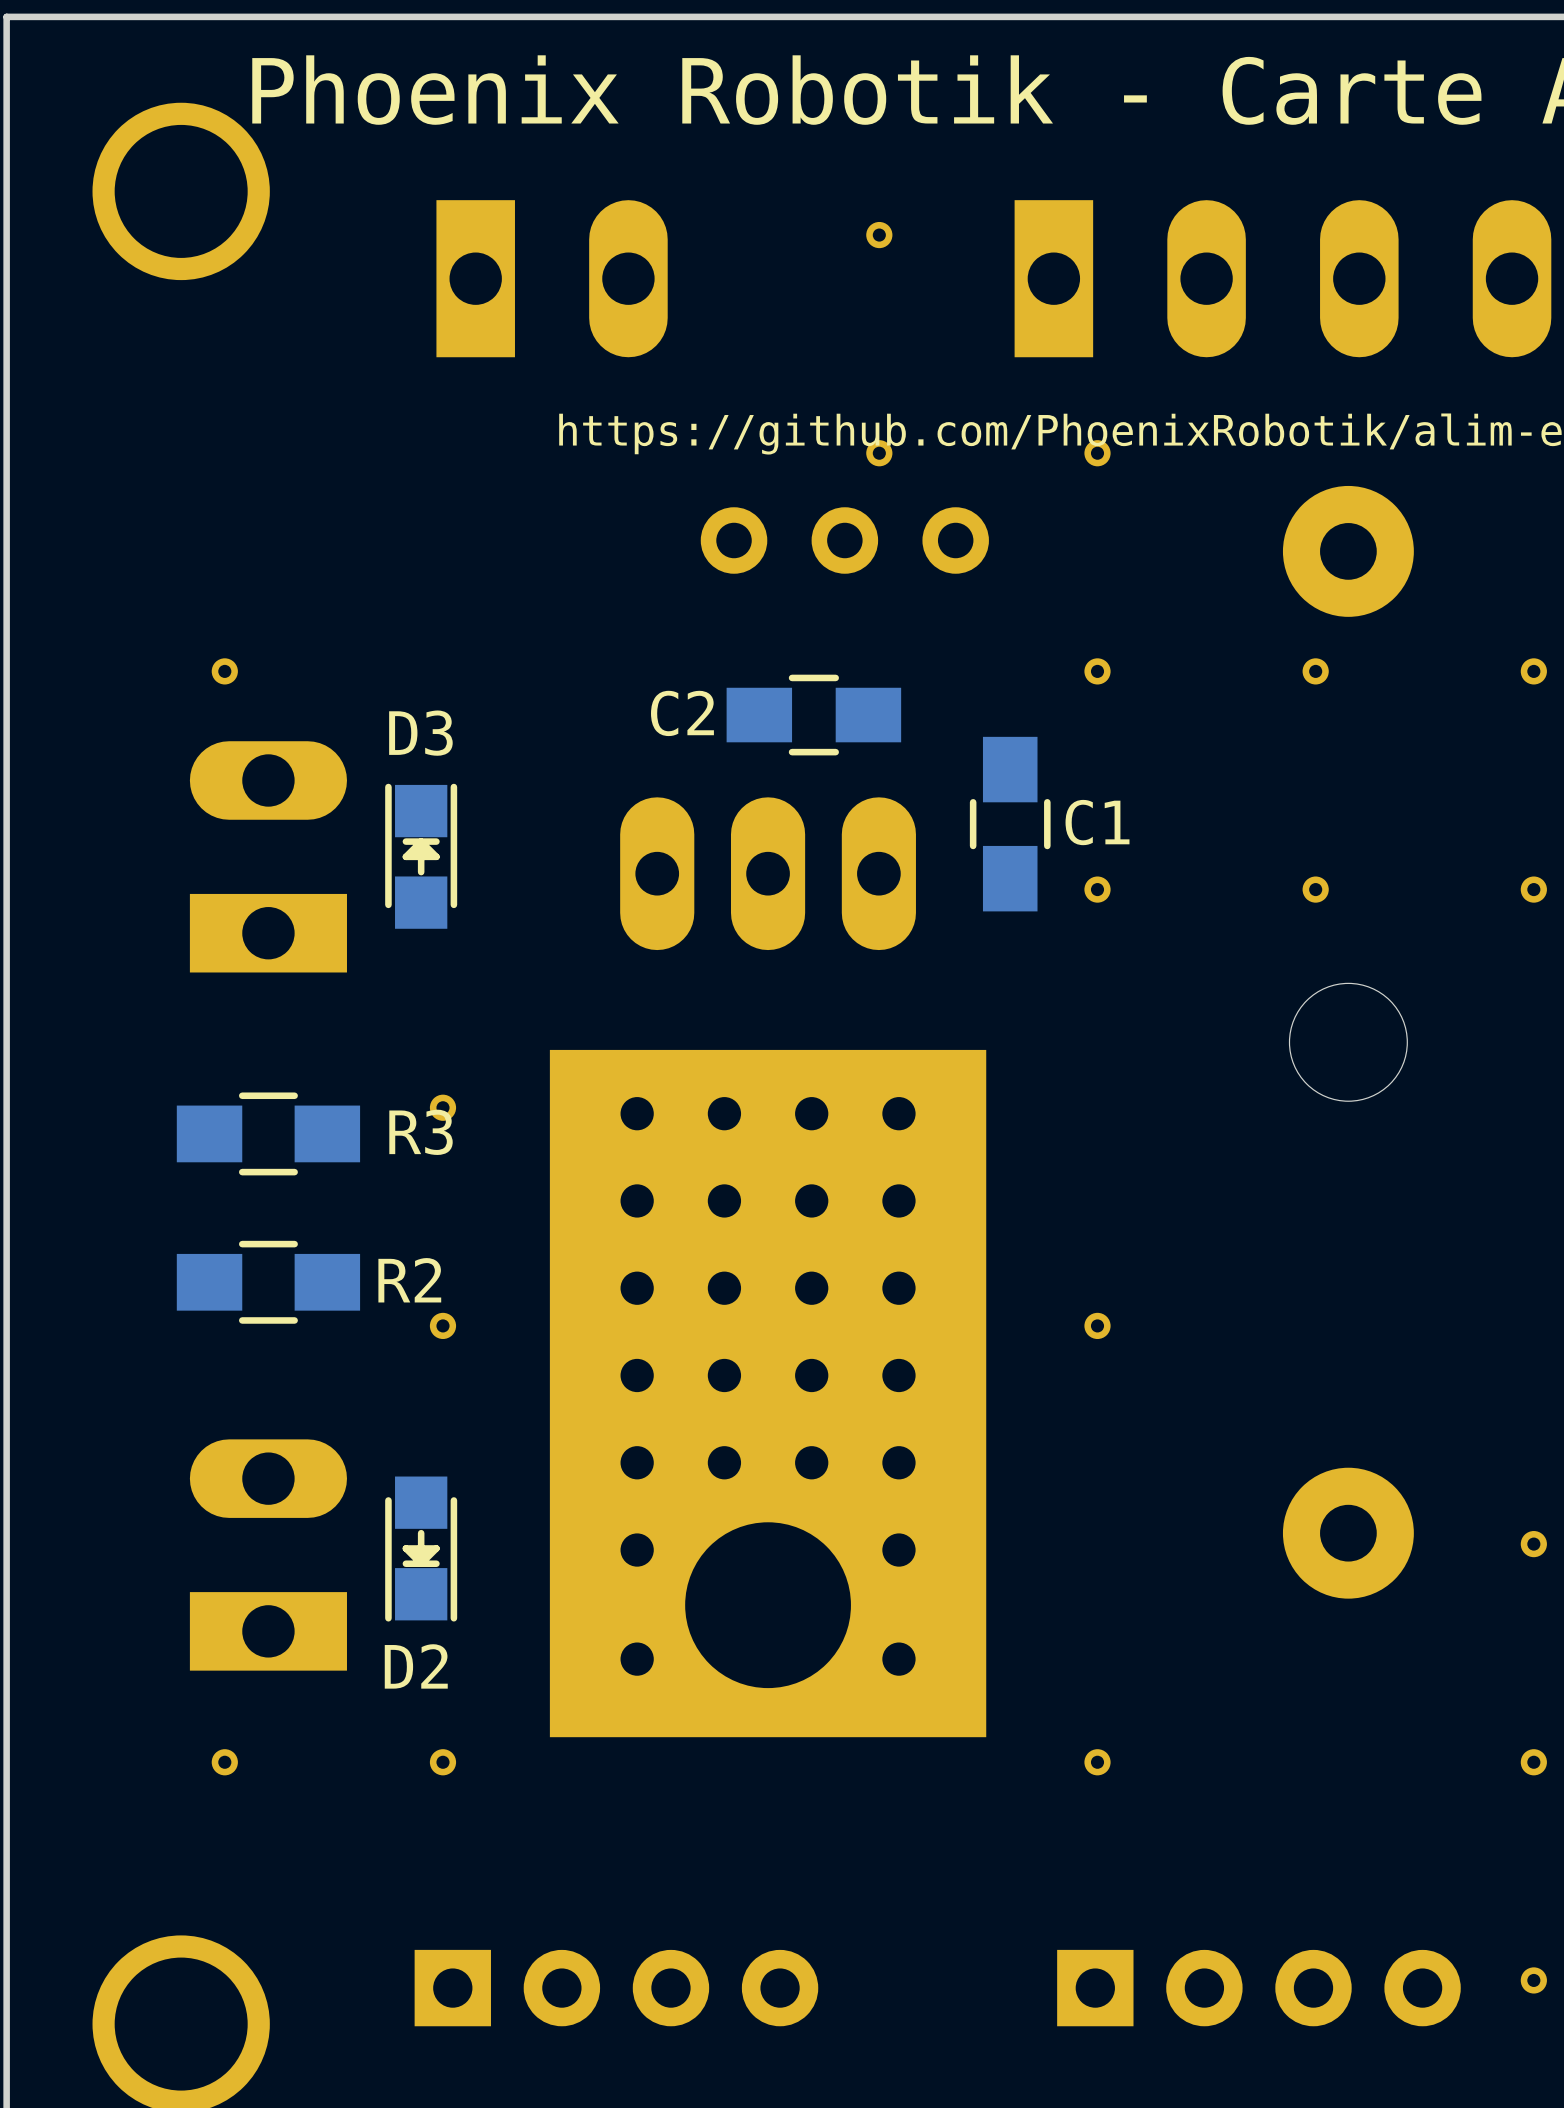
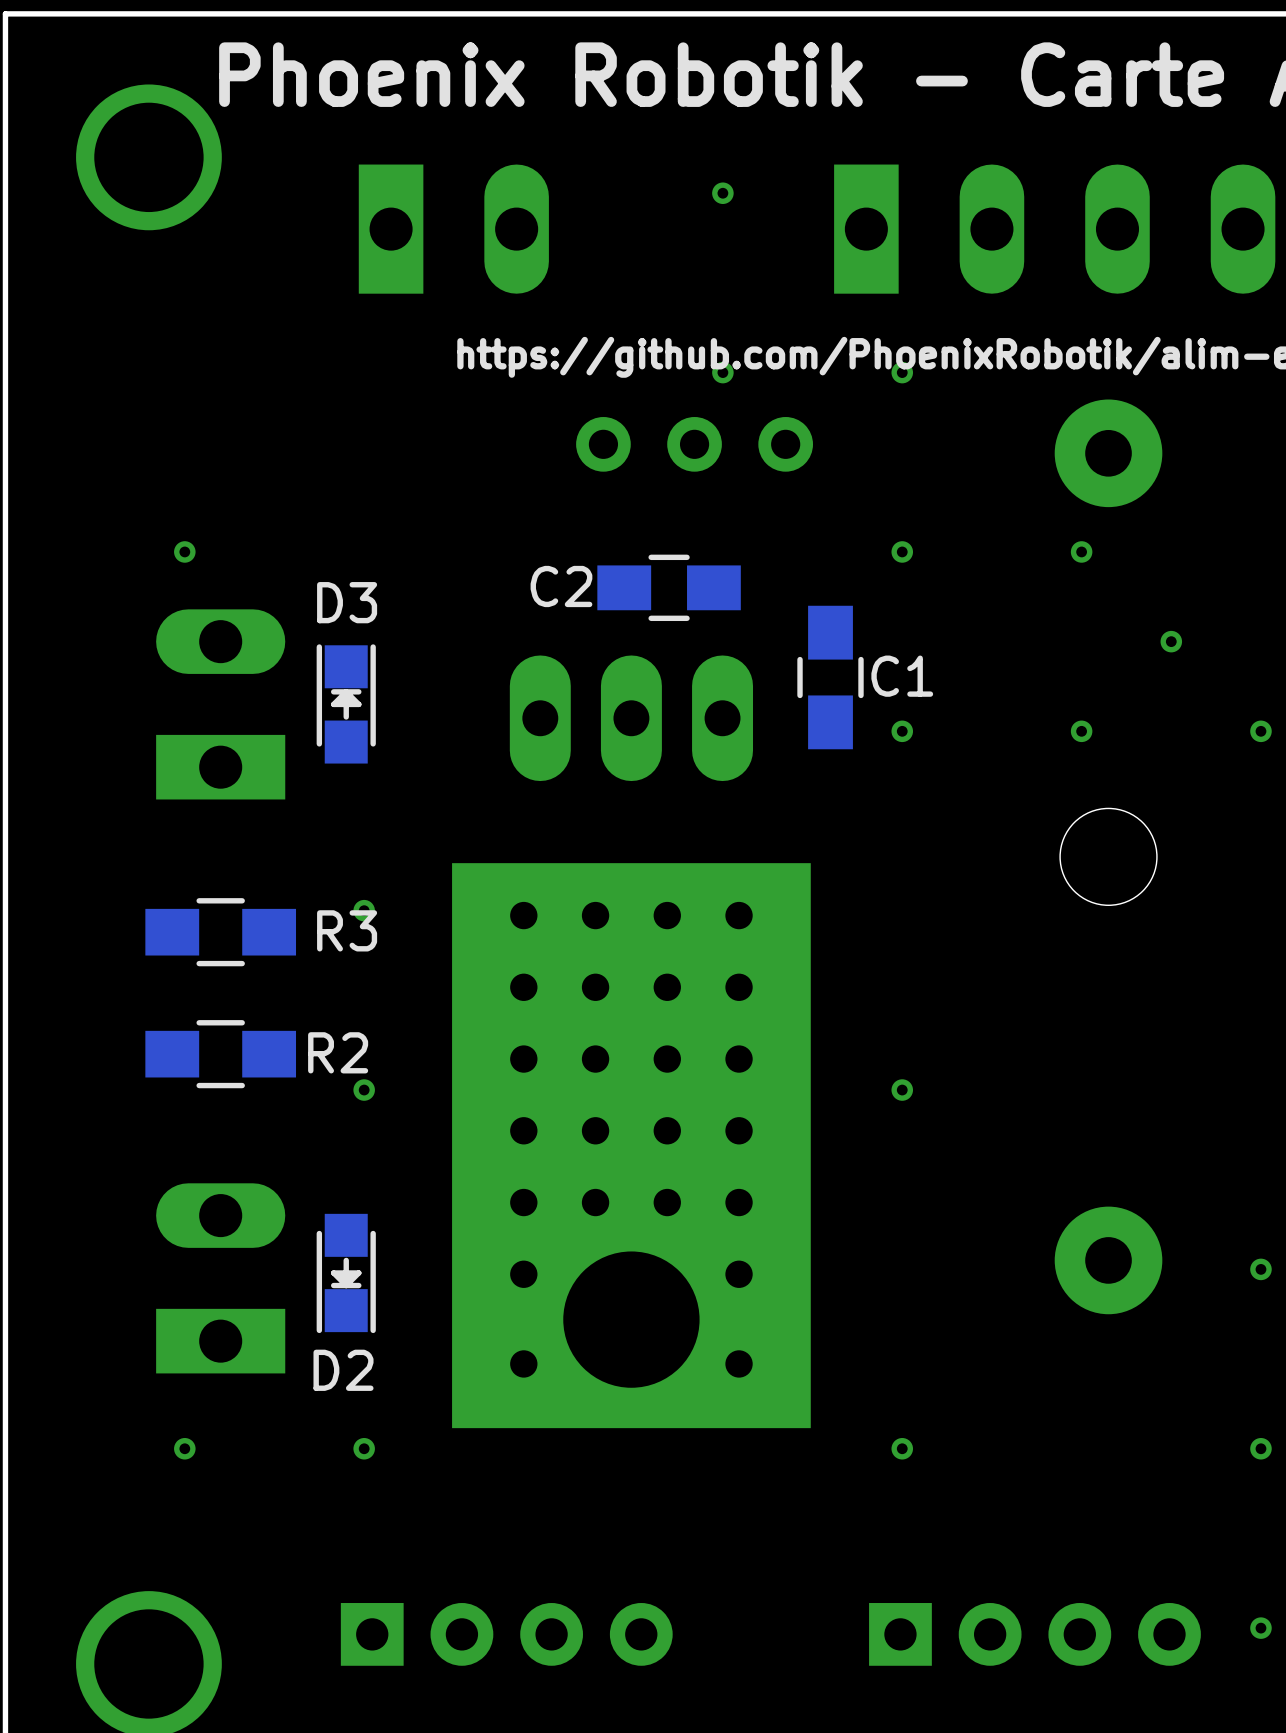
part position: (1533, 671) -> (1171, 641)

